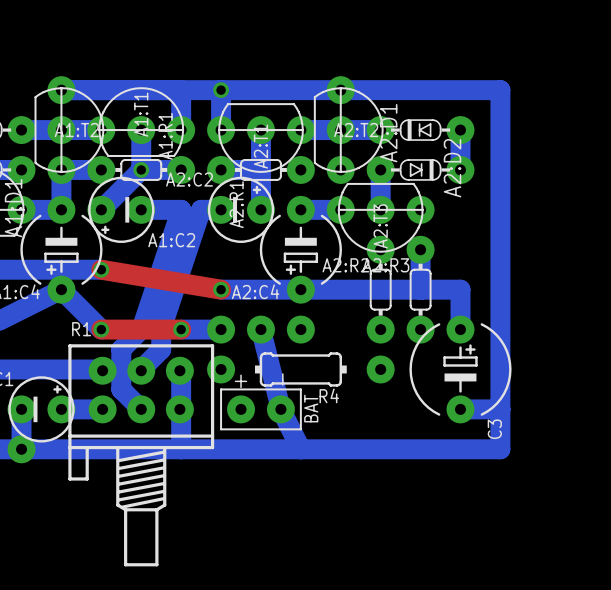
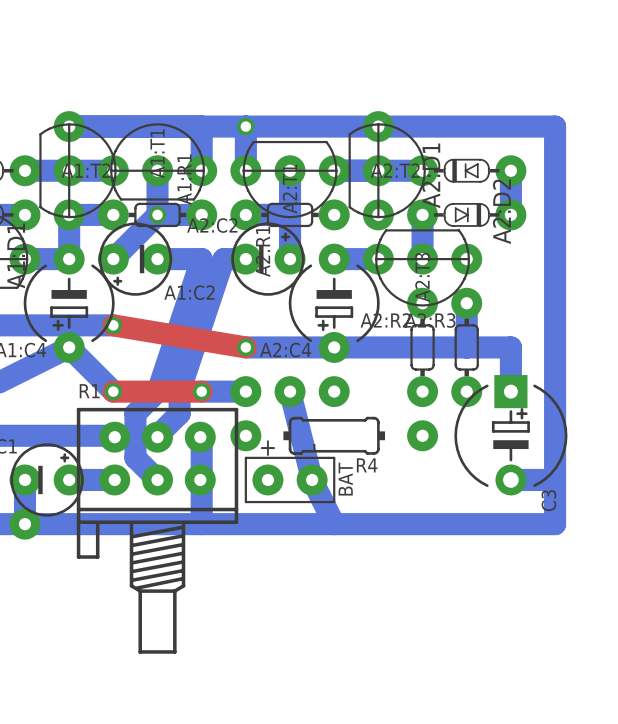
C3 footprint: [409, 315, 512, 424] -> [454, 375, 568, 496]

